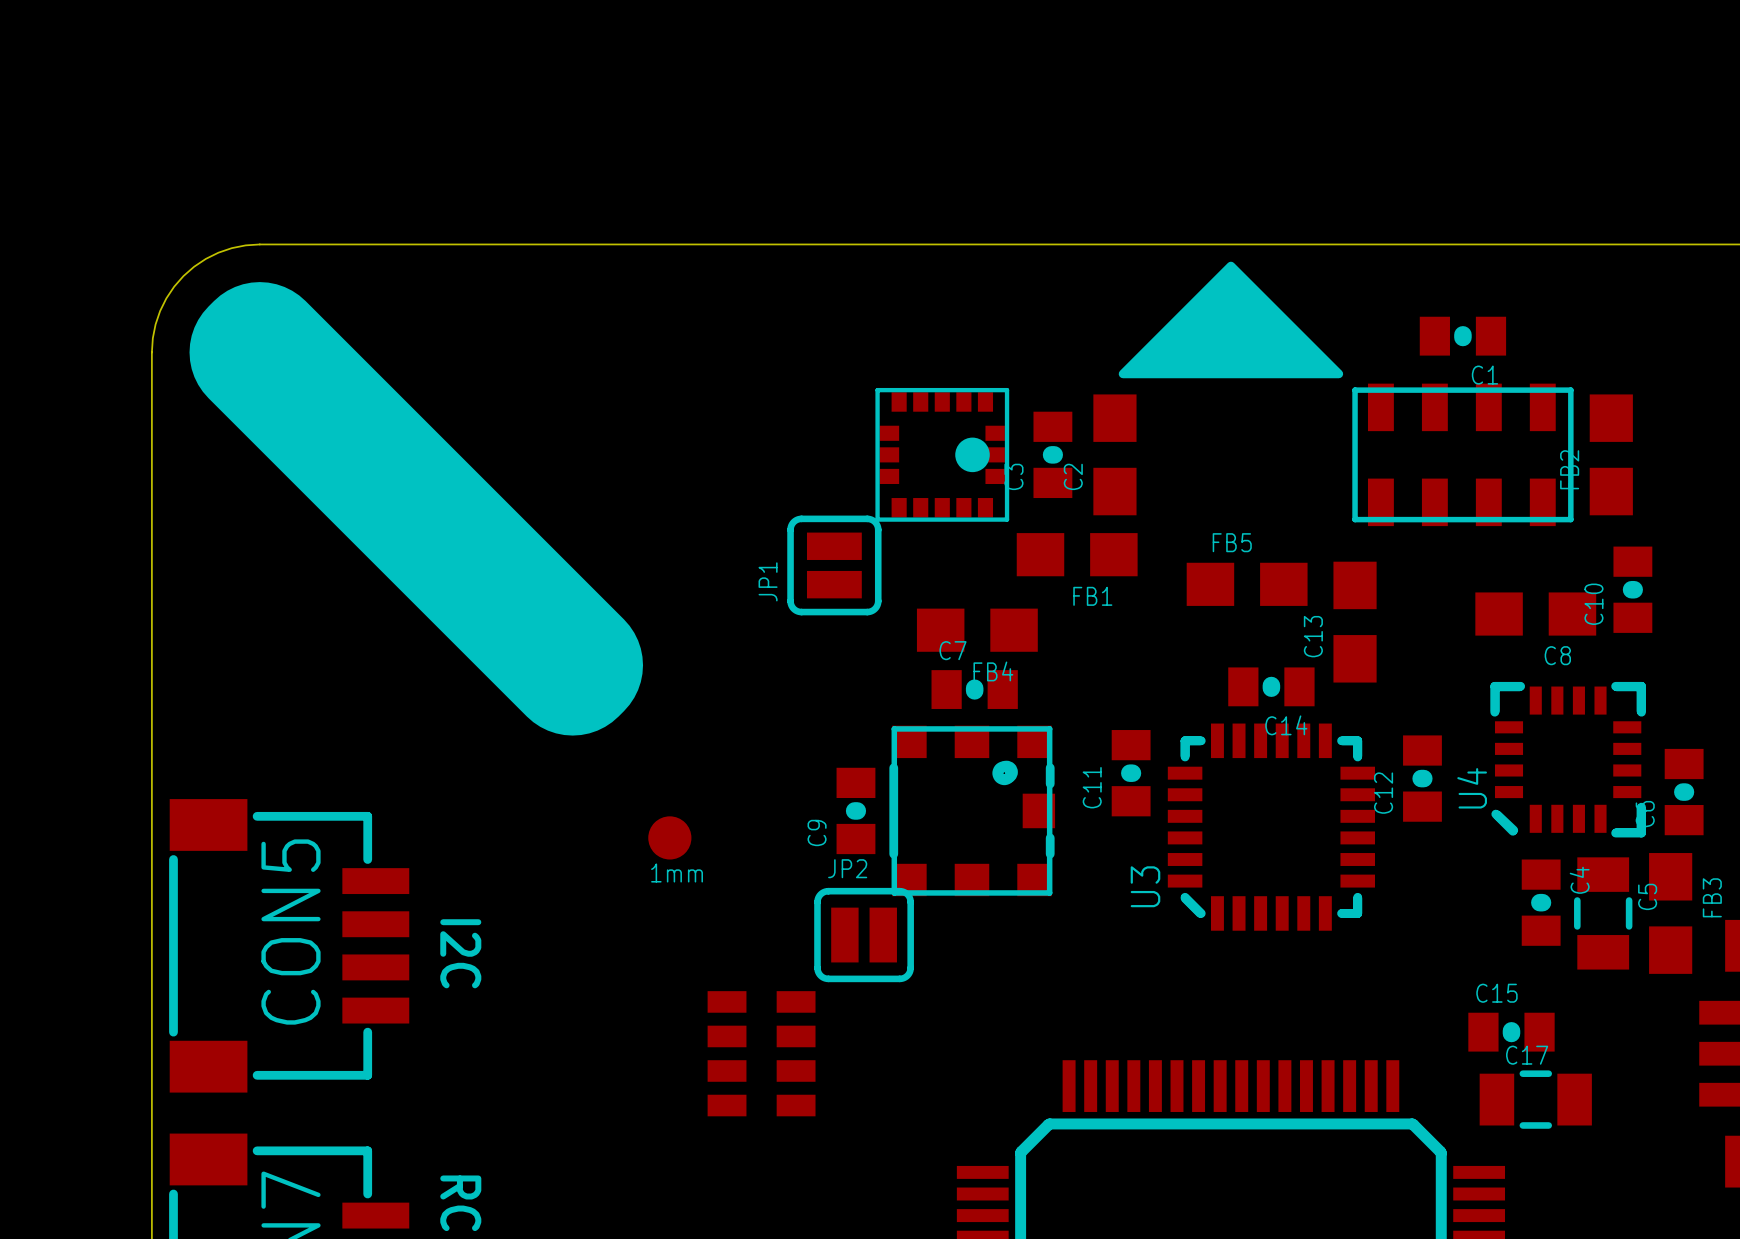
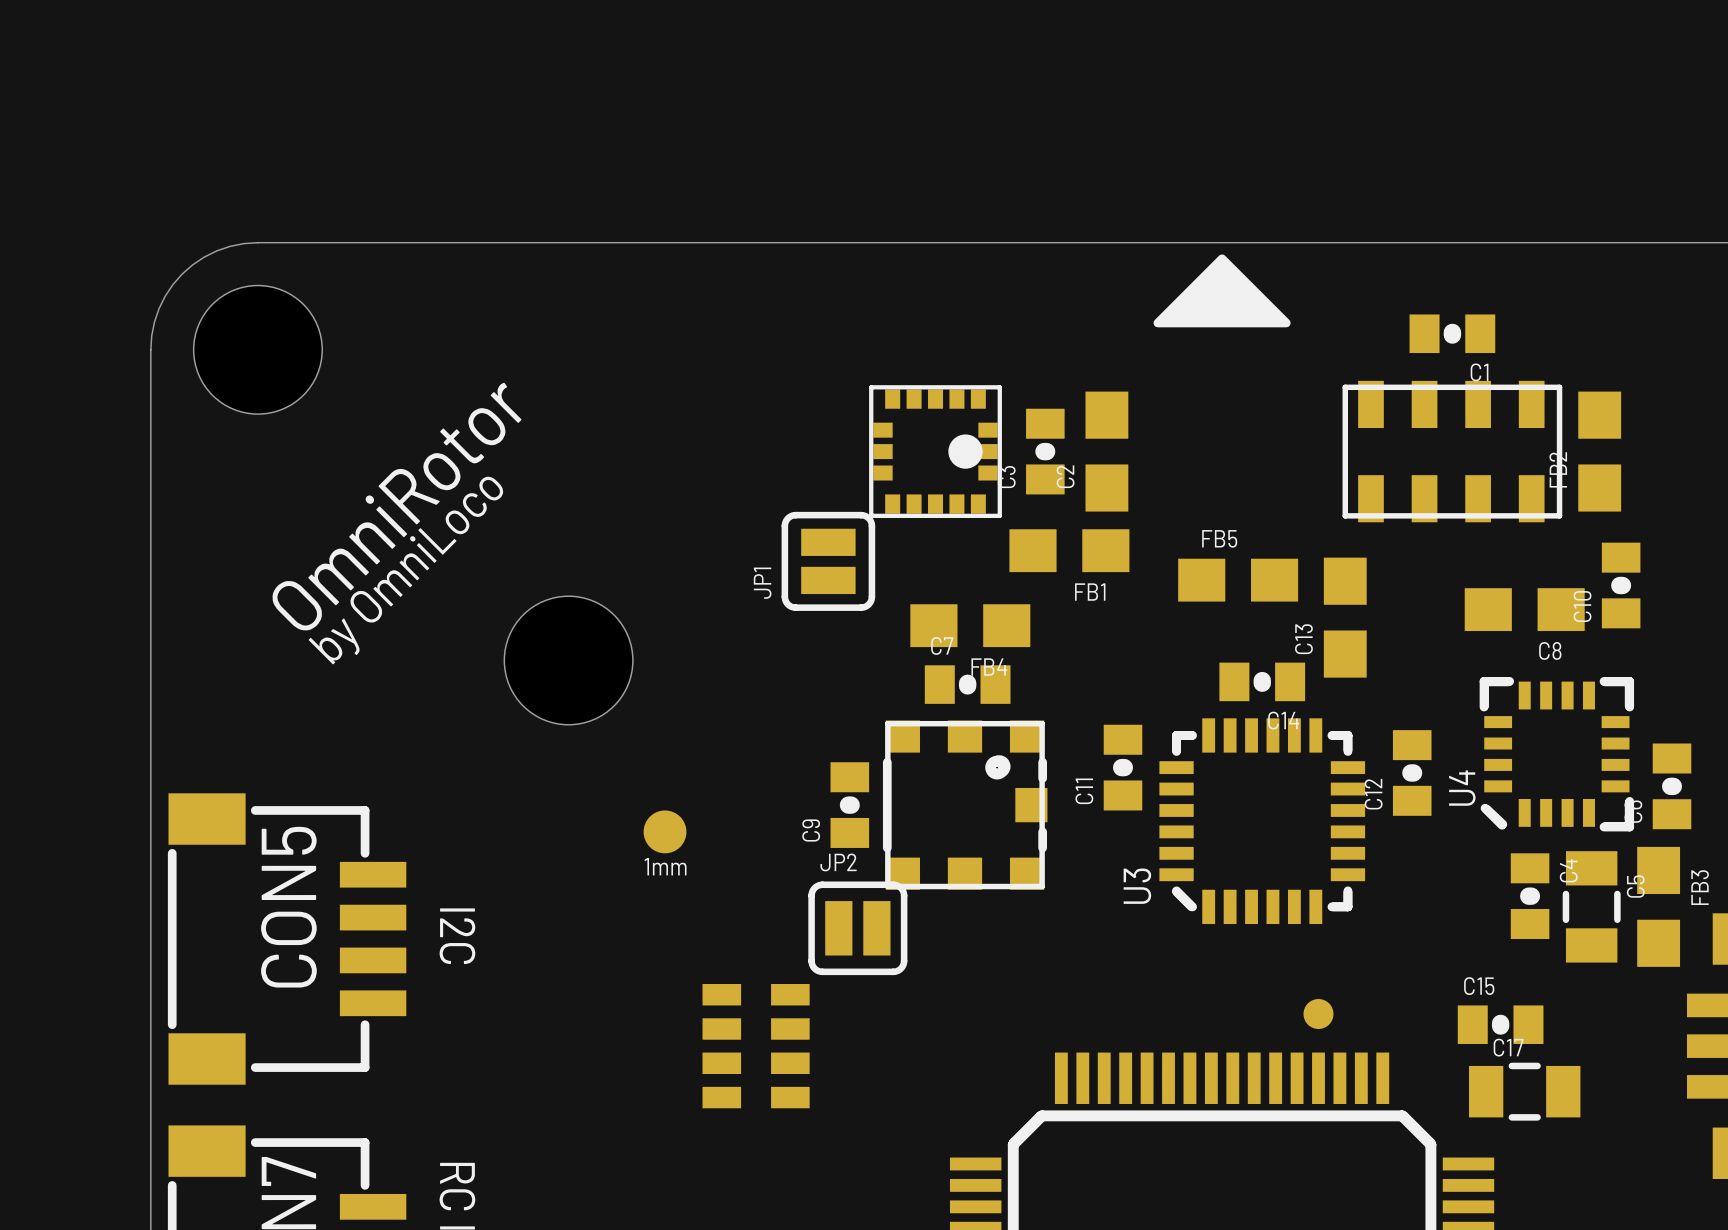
drawing shape: [1118, 261, 1344, 379] -> [1153, 254, 1291, 328]
drawing: [189, 282, 644, 736] -> none
text: none -> OmniRotor (396, 506)
text: none -> by OmniLoco (405, 570)
part: none -> (1318, 1014)

